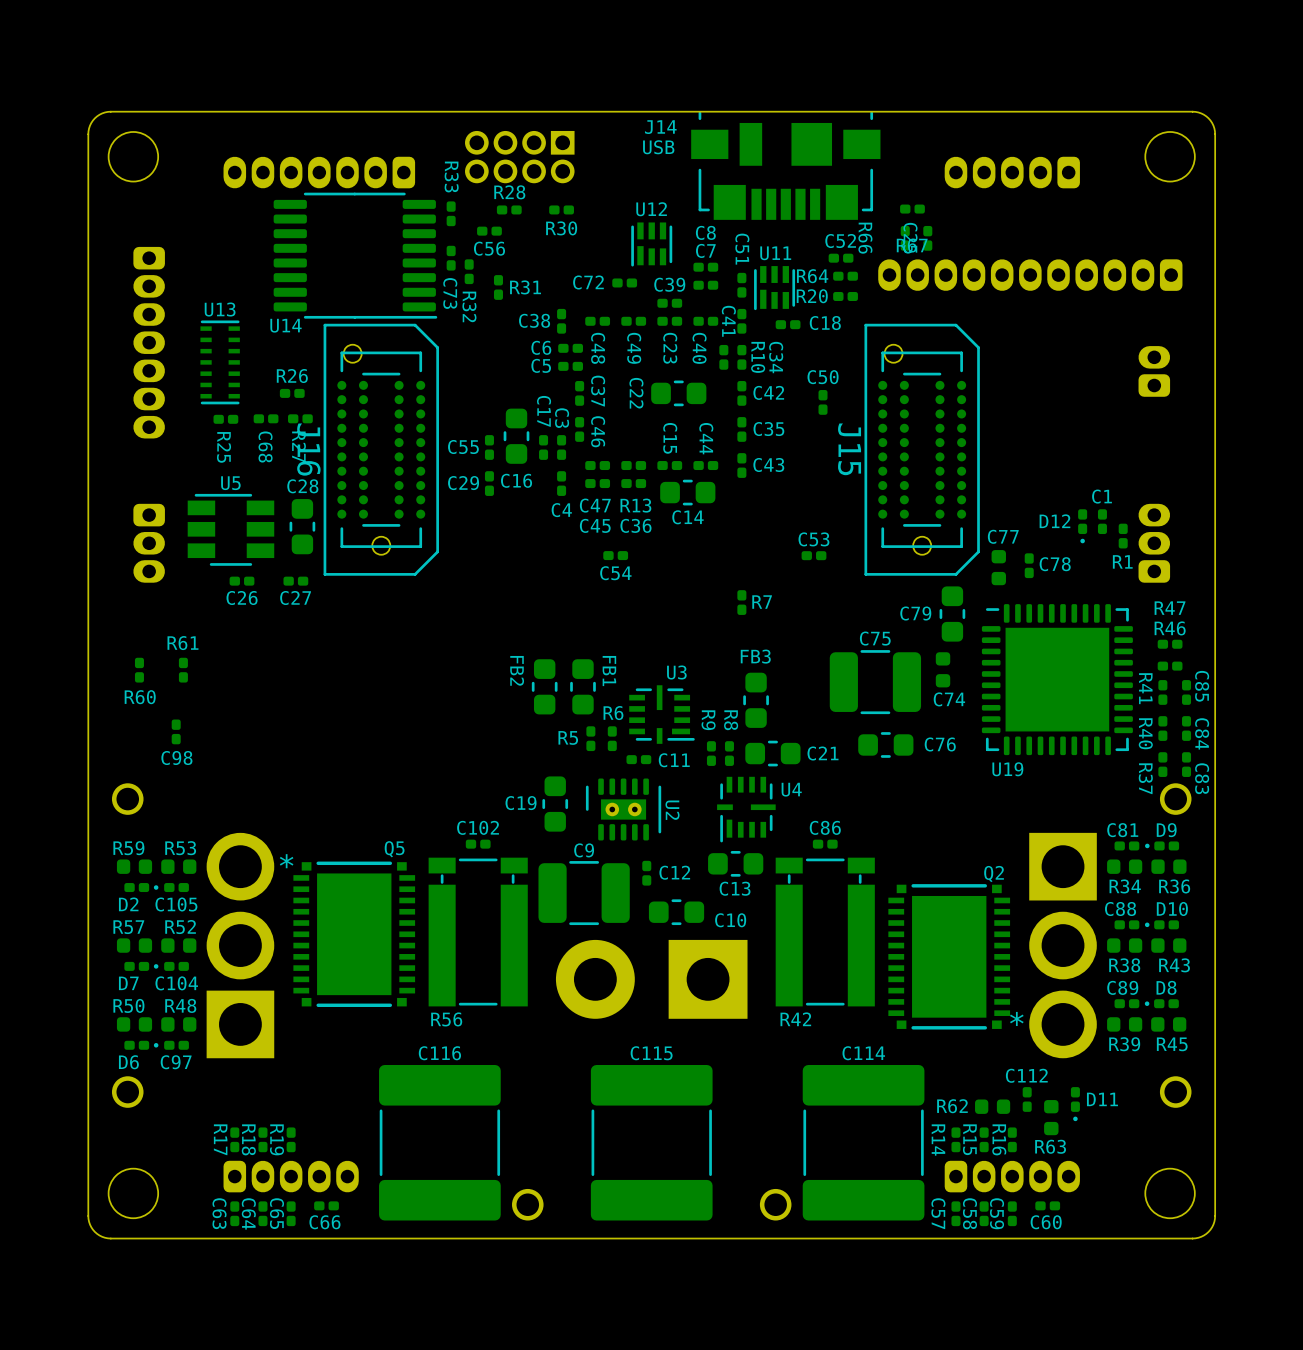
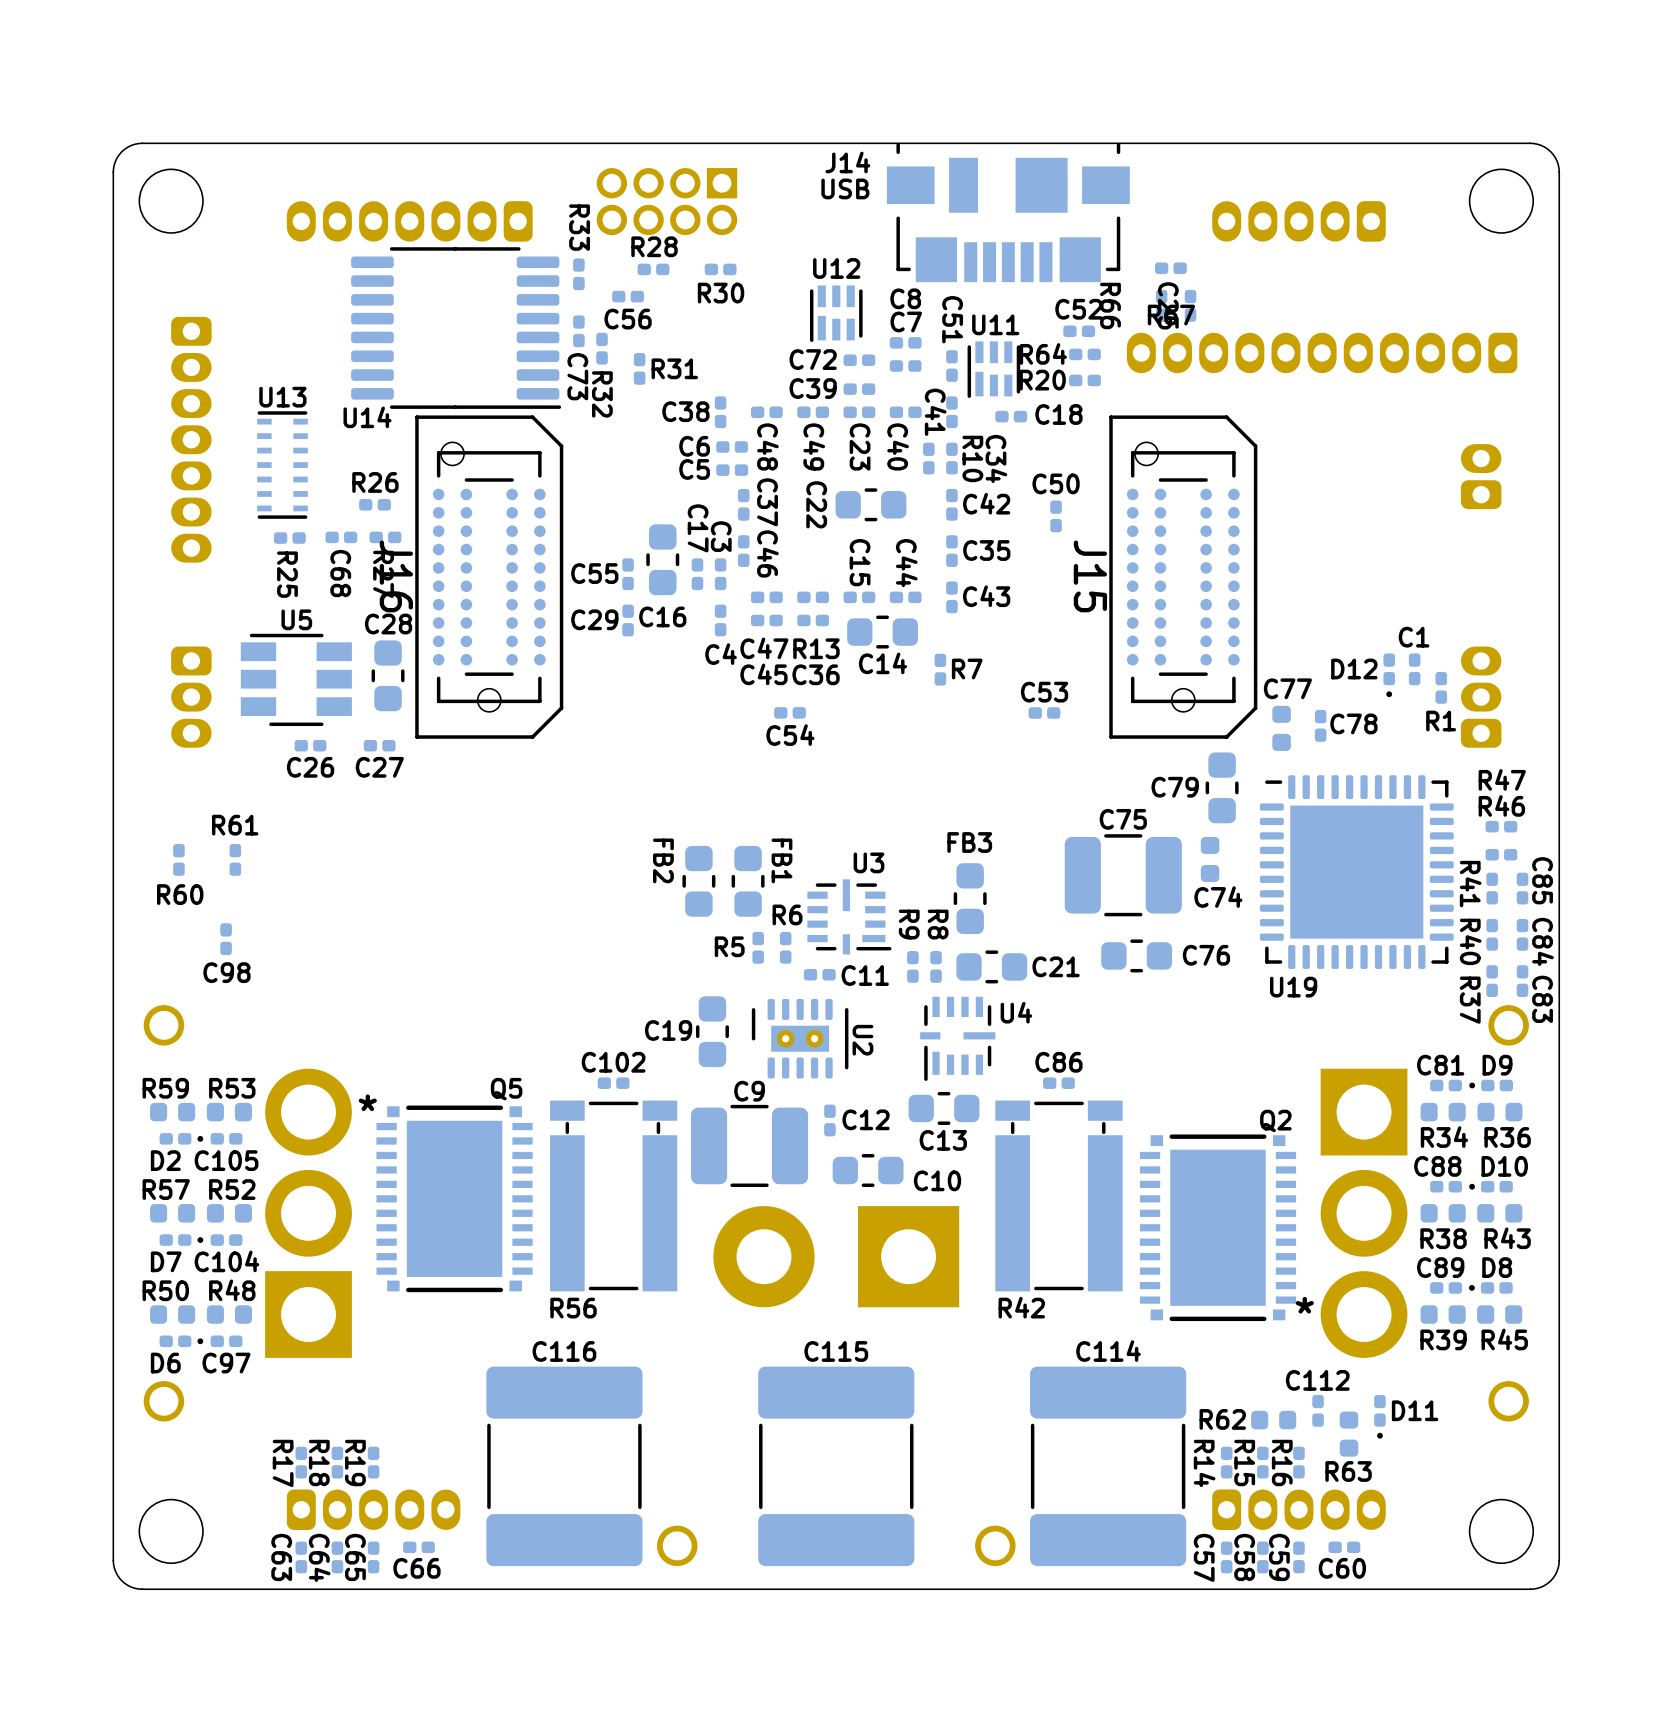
C72 position: (624, 282) -> (859, 360)
C39 name position: C39 (669, 284) -> C39 (813, 388)
R7 position: (741, 602) -> (940, 669)

